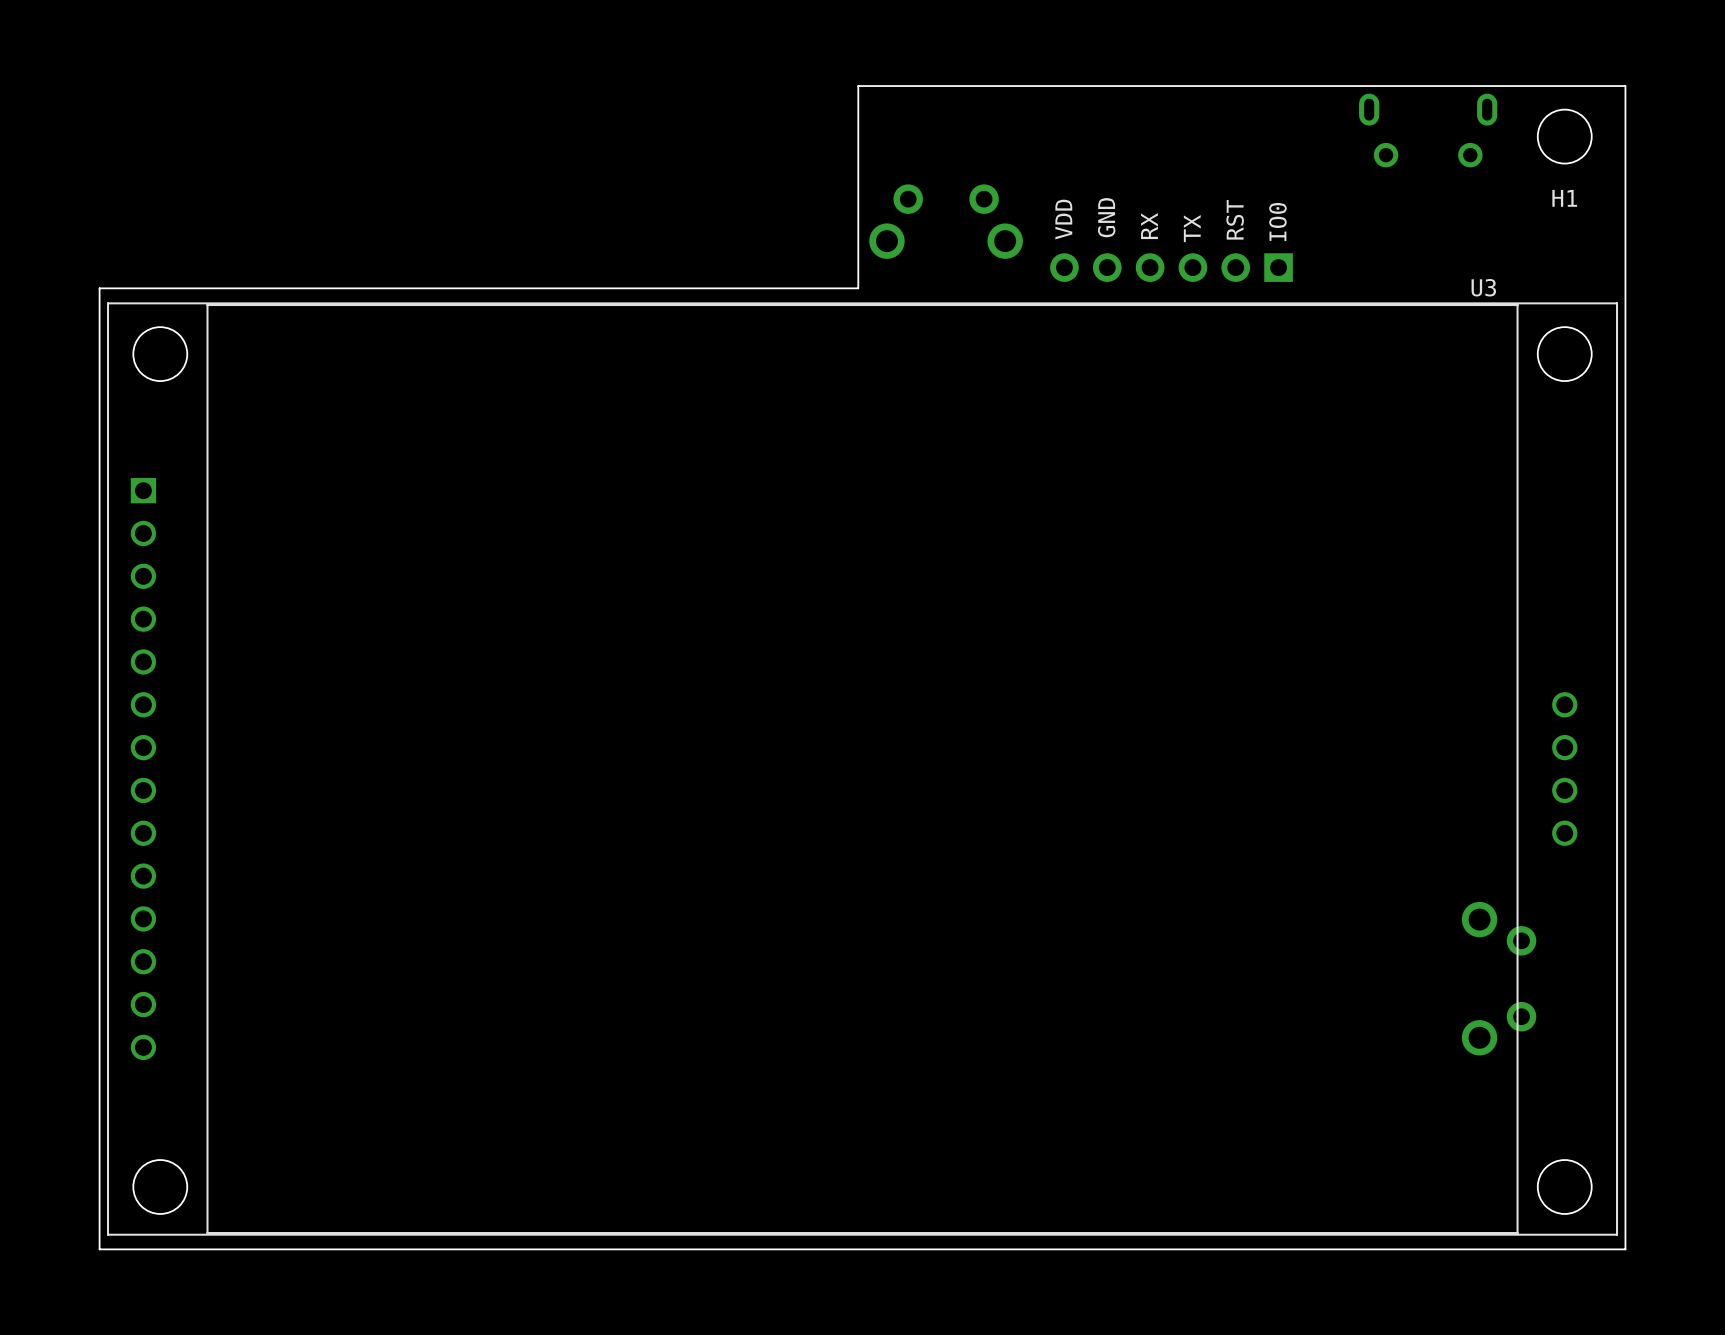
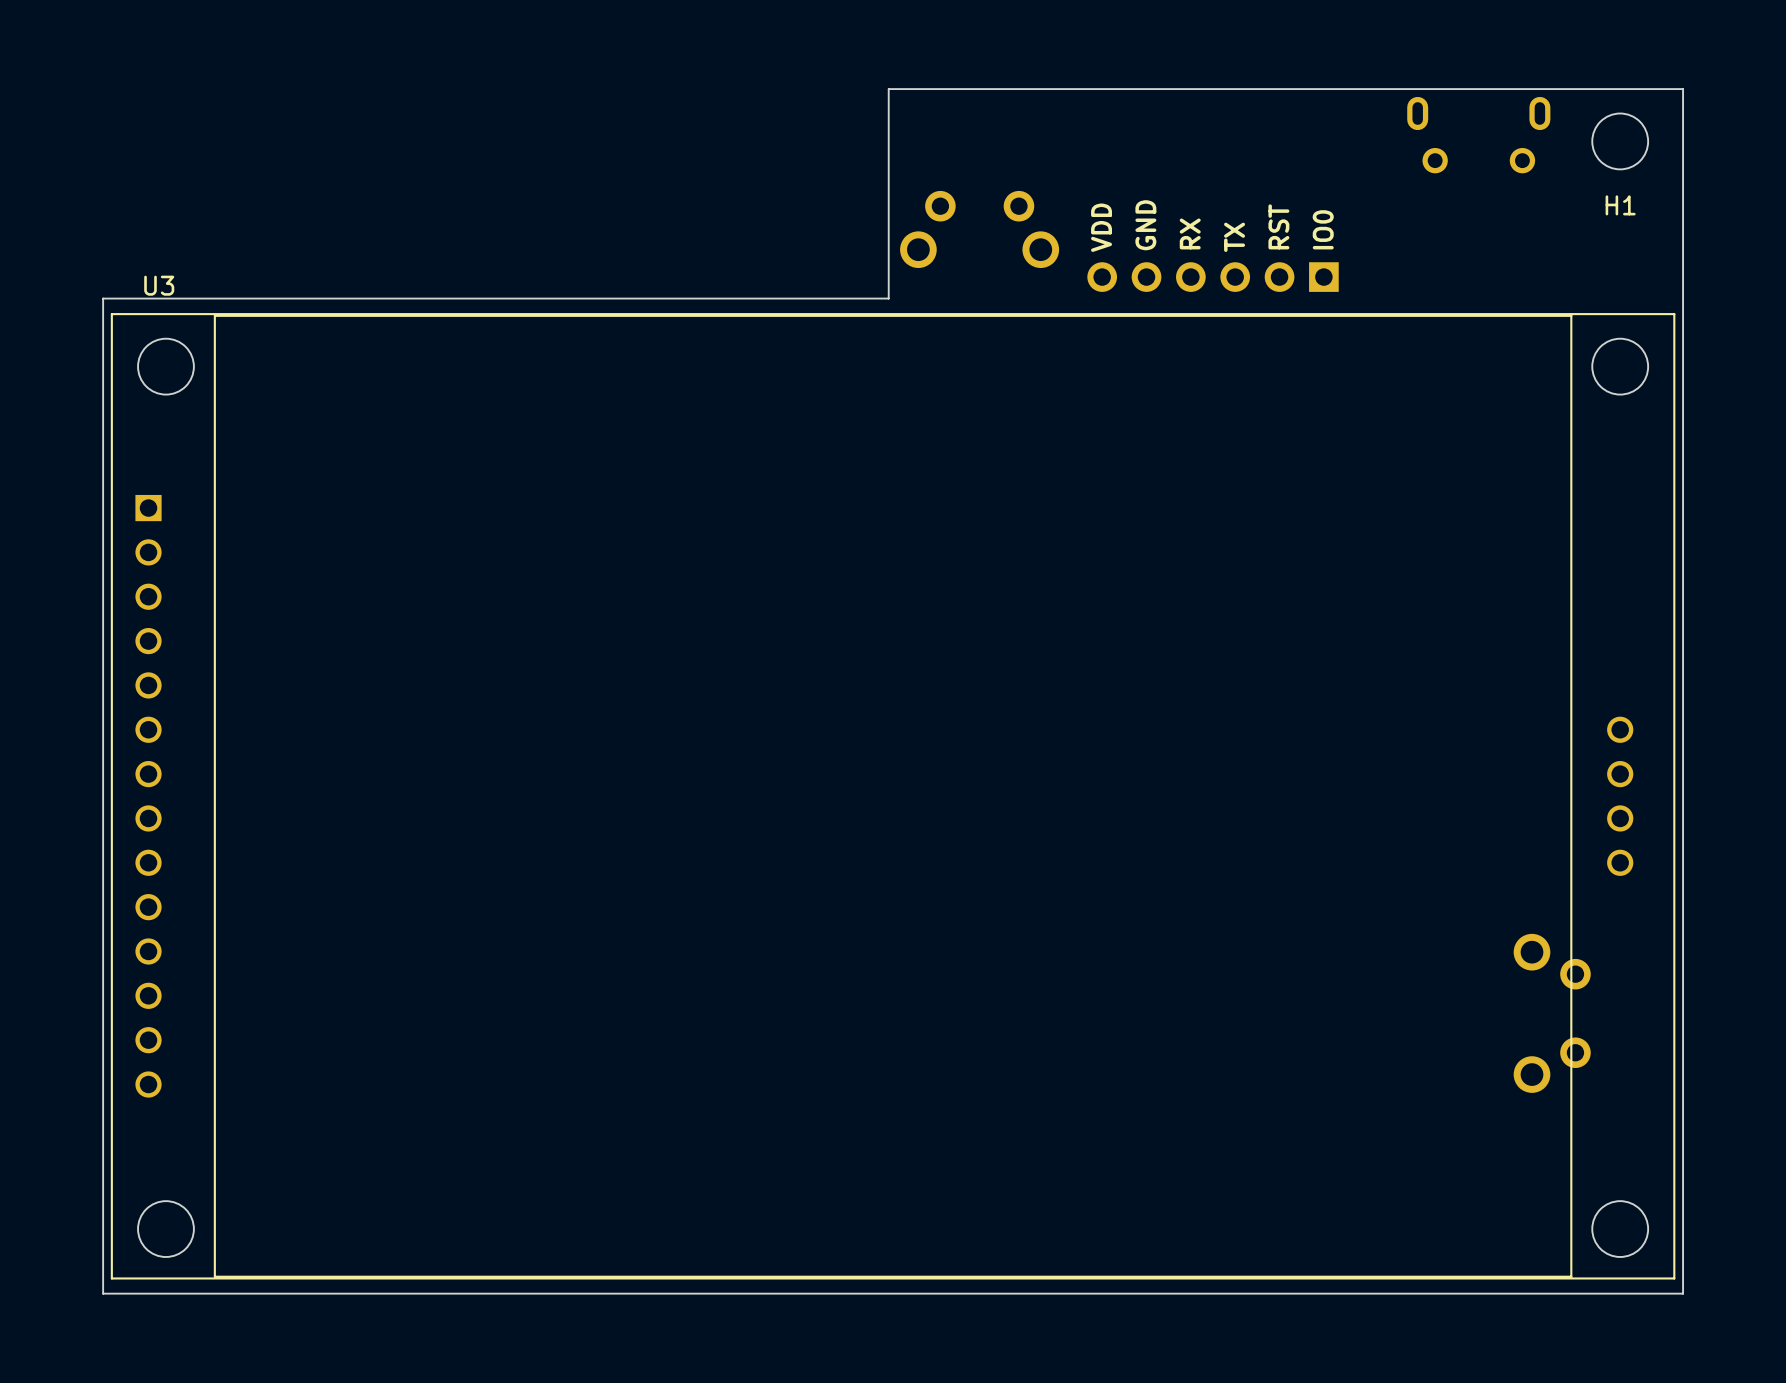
U3 name position: U3 (1483, 287) -> U3 (159, 285)

